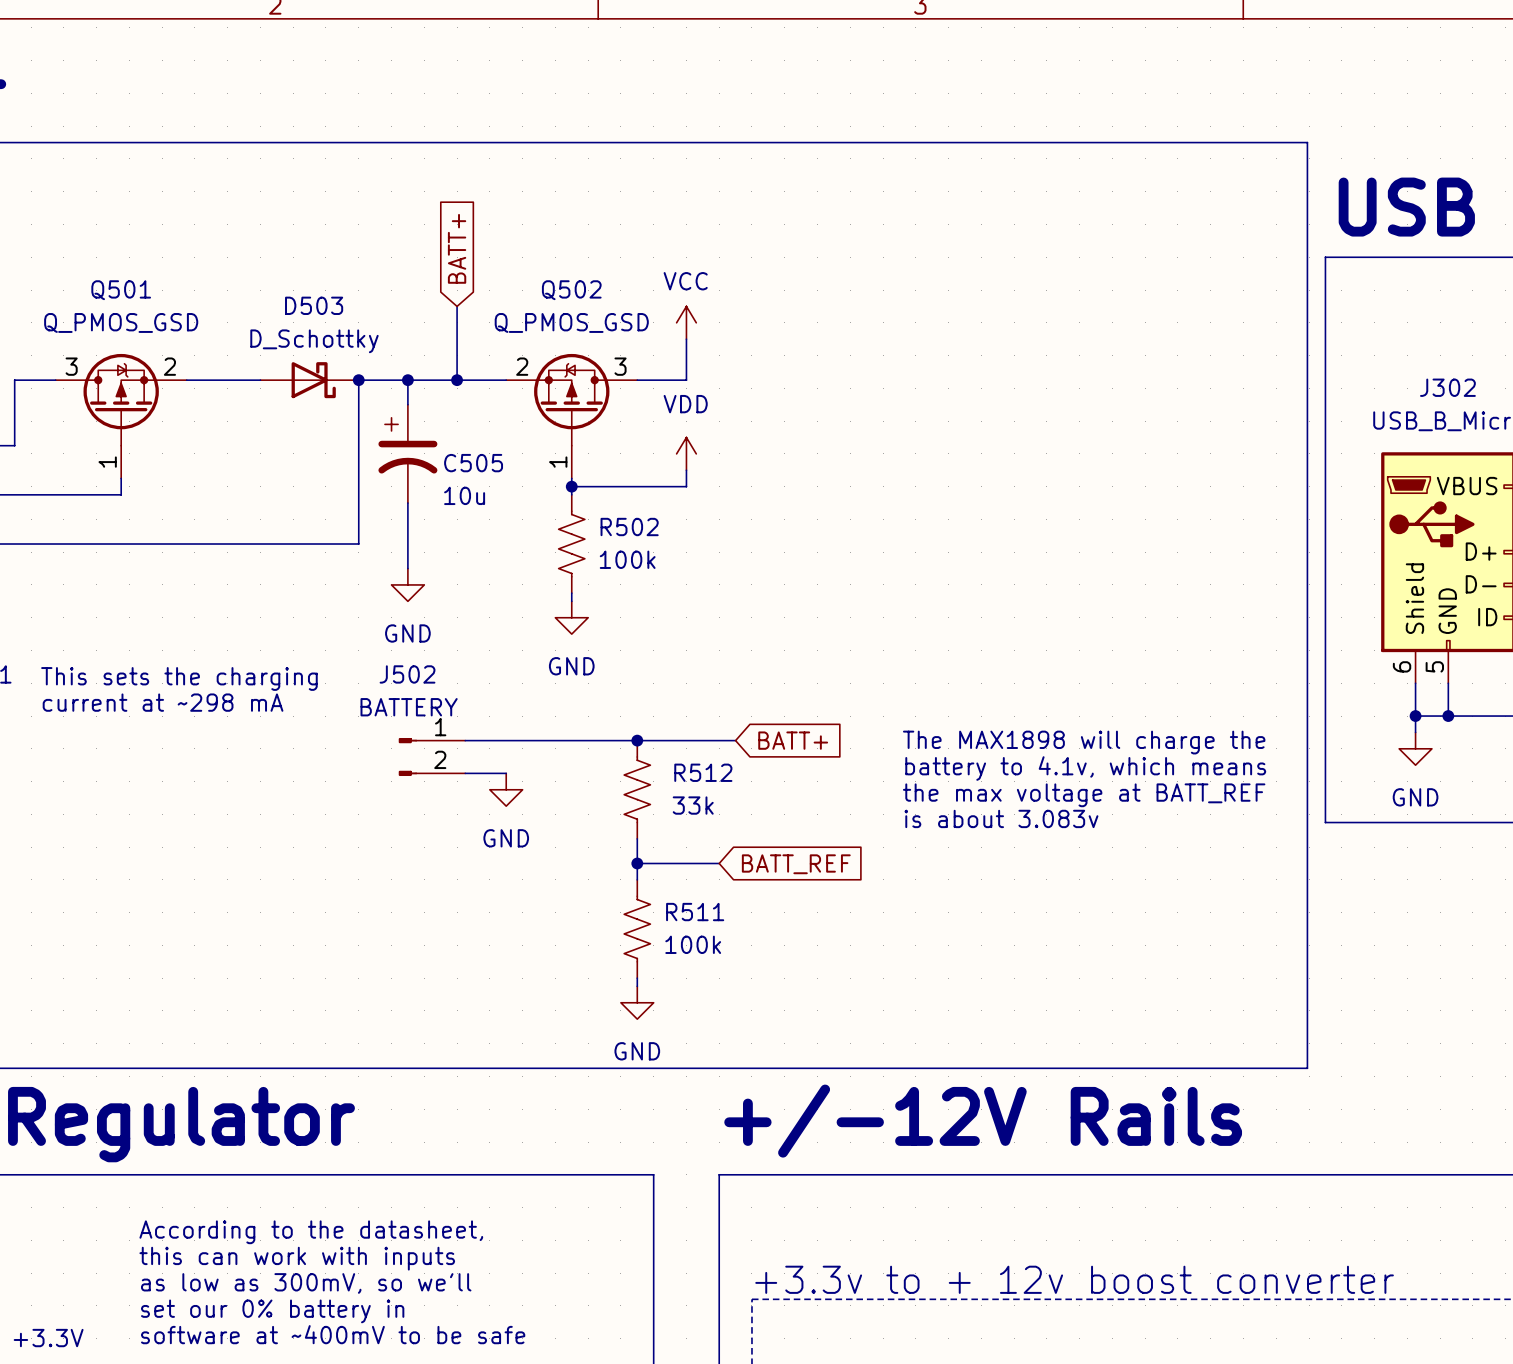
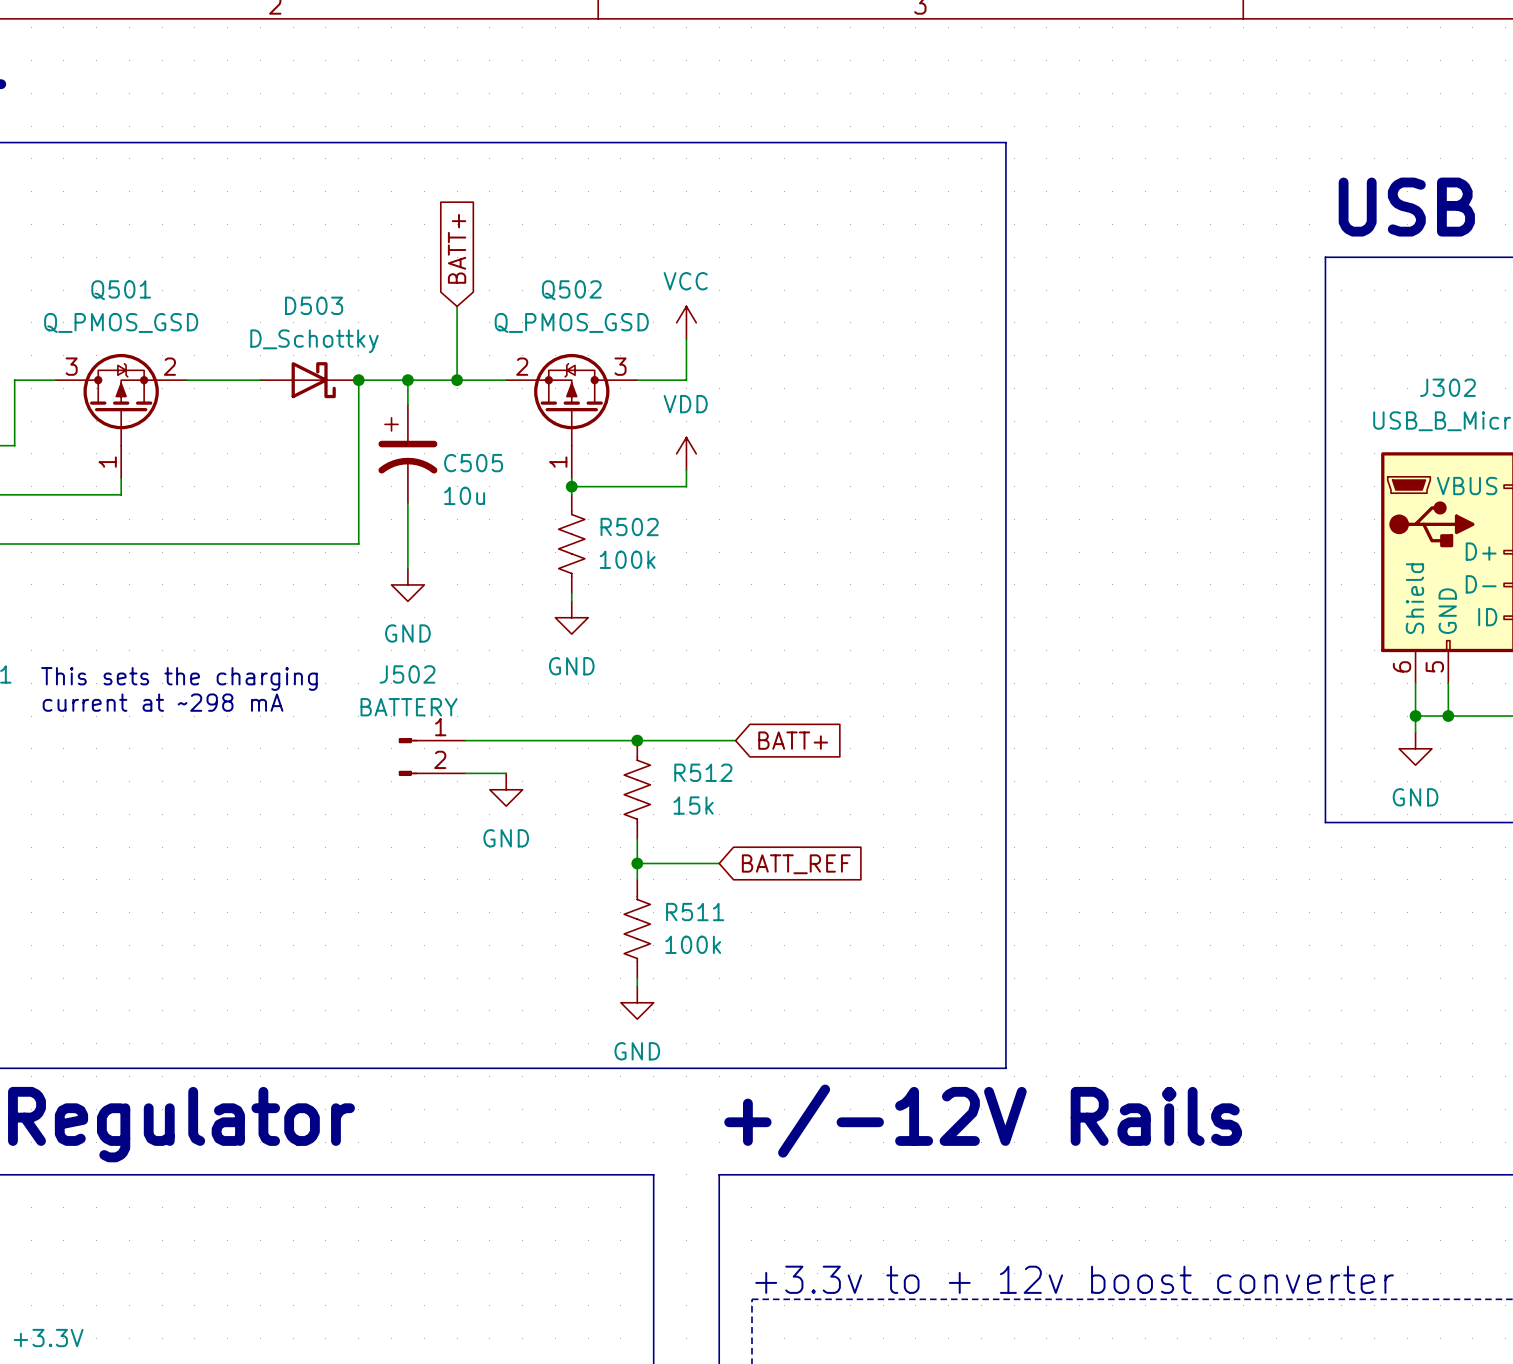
line: (1005, 142) (1307, 142) (1307, 1068) (1005, 1068) -> (1005, 142) (1005, 1068)
text: The MAX1898 will charge the (1084, 742) -> none
text: battery to 4.1v, which means (1085, 768) -> none
text: the max voltage at BATT_REF (1084, 795) -> none
R512 value: 33k (693, 805) -> 15k (693, 805)
text: is about 3.083v (1001, 818) -> none
text: According to the datasheet, (311, 1232) -> none
text: this can work with inputs (297, 1258) -> none
text: as low as 300mV, so we'll (306, 1283) -> none
text: set our 0% battery in (272, 1311) -> none
text: software at ~400mV to be safe (333, 1334) -> none

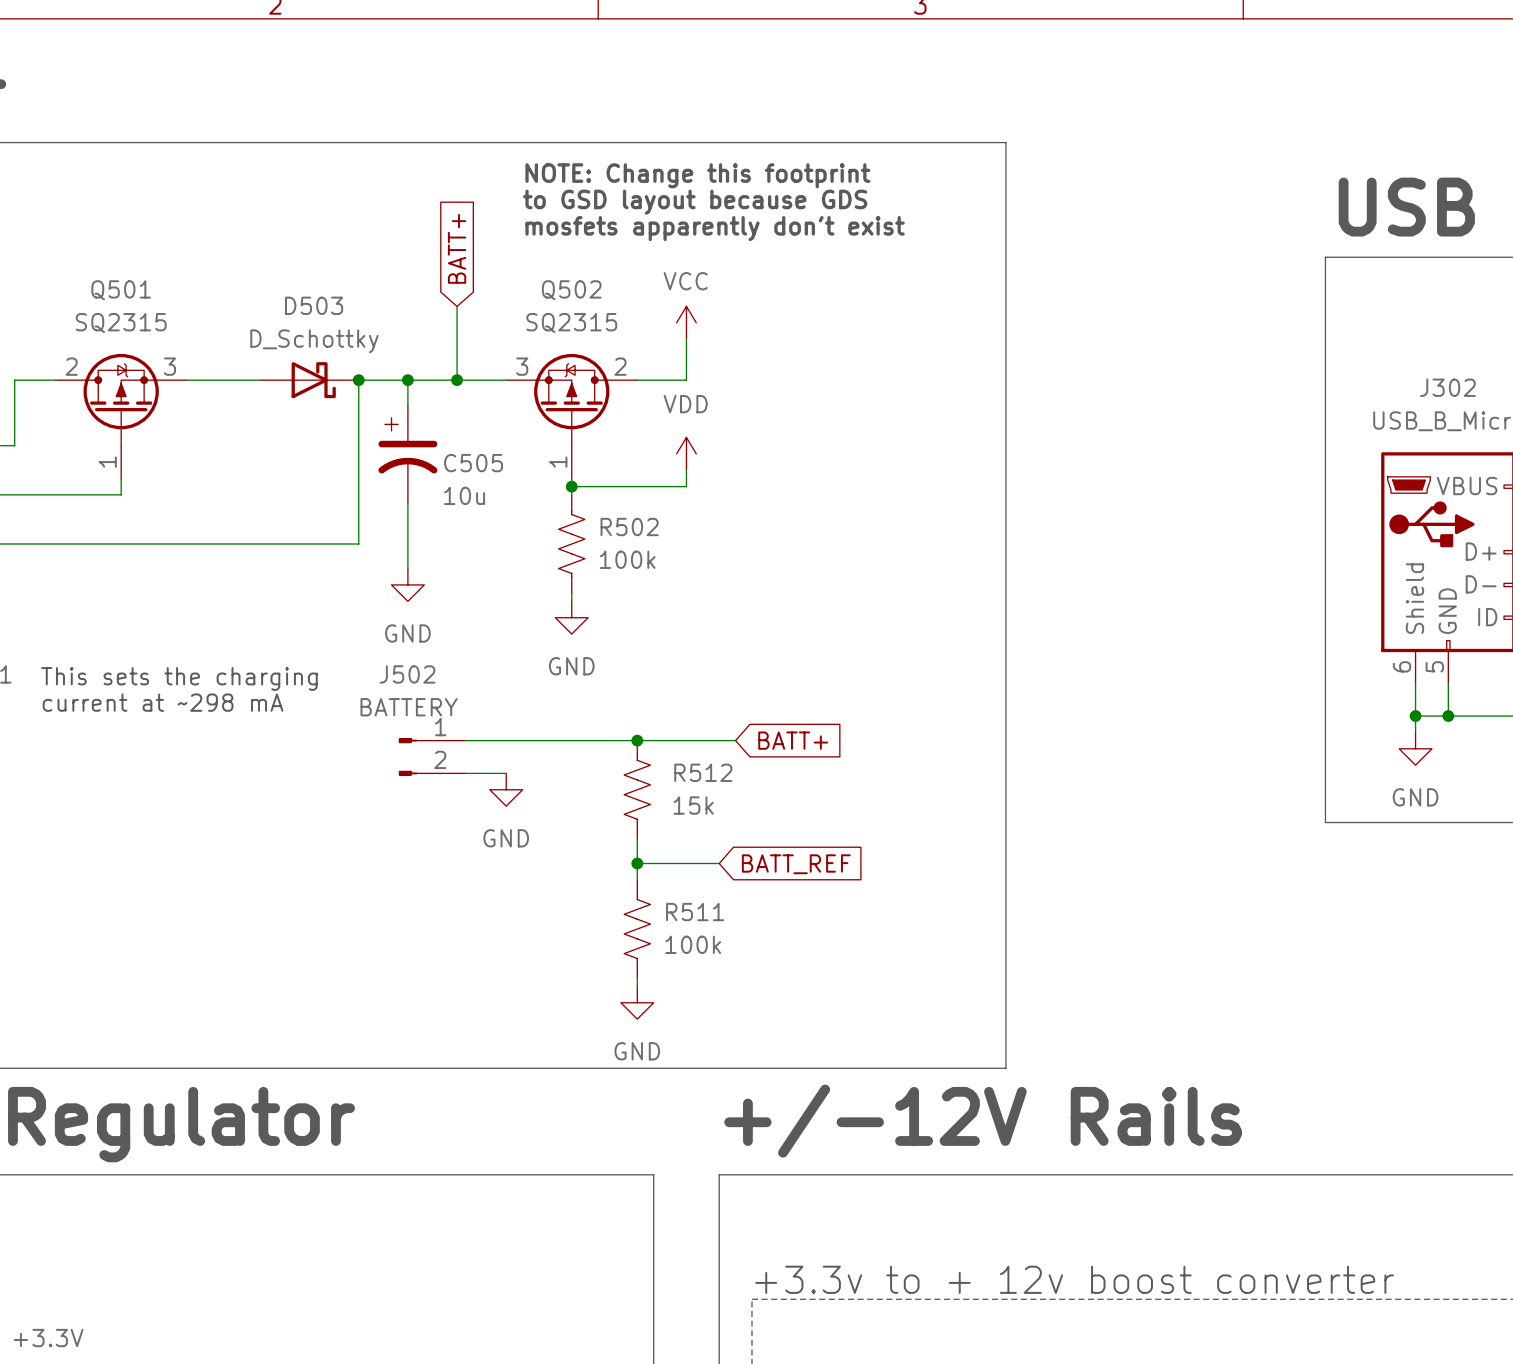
text: none -> NOTE: Change this footprint (697, 175)
text: none -> to GSD layout because GDS (695, 202)
text: none -> mosfets apparently don't exist (715, 228)
Q501 value: Q_PMOS_GSD (121, 322) -> SQ2315 (121, 322)
Q502 value: Q_PMOS_GSD (571, 322) -> SQ2315 (571, 322)
Q501 pin number: 3 (71, 366) -> 2 (71, 366)
Q501 pin number: 2 (169, 366) -> 3 (169, 366)
Q502 pin number: 2 (522, 366) -> 3 (522, 366)
Q502 pin number: 3 (620, 366) -> 2 (620, 366)

